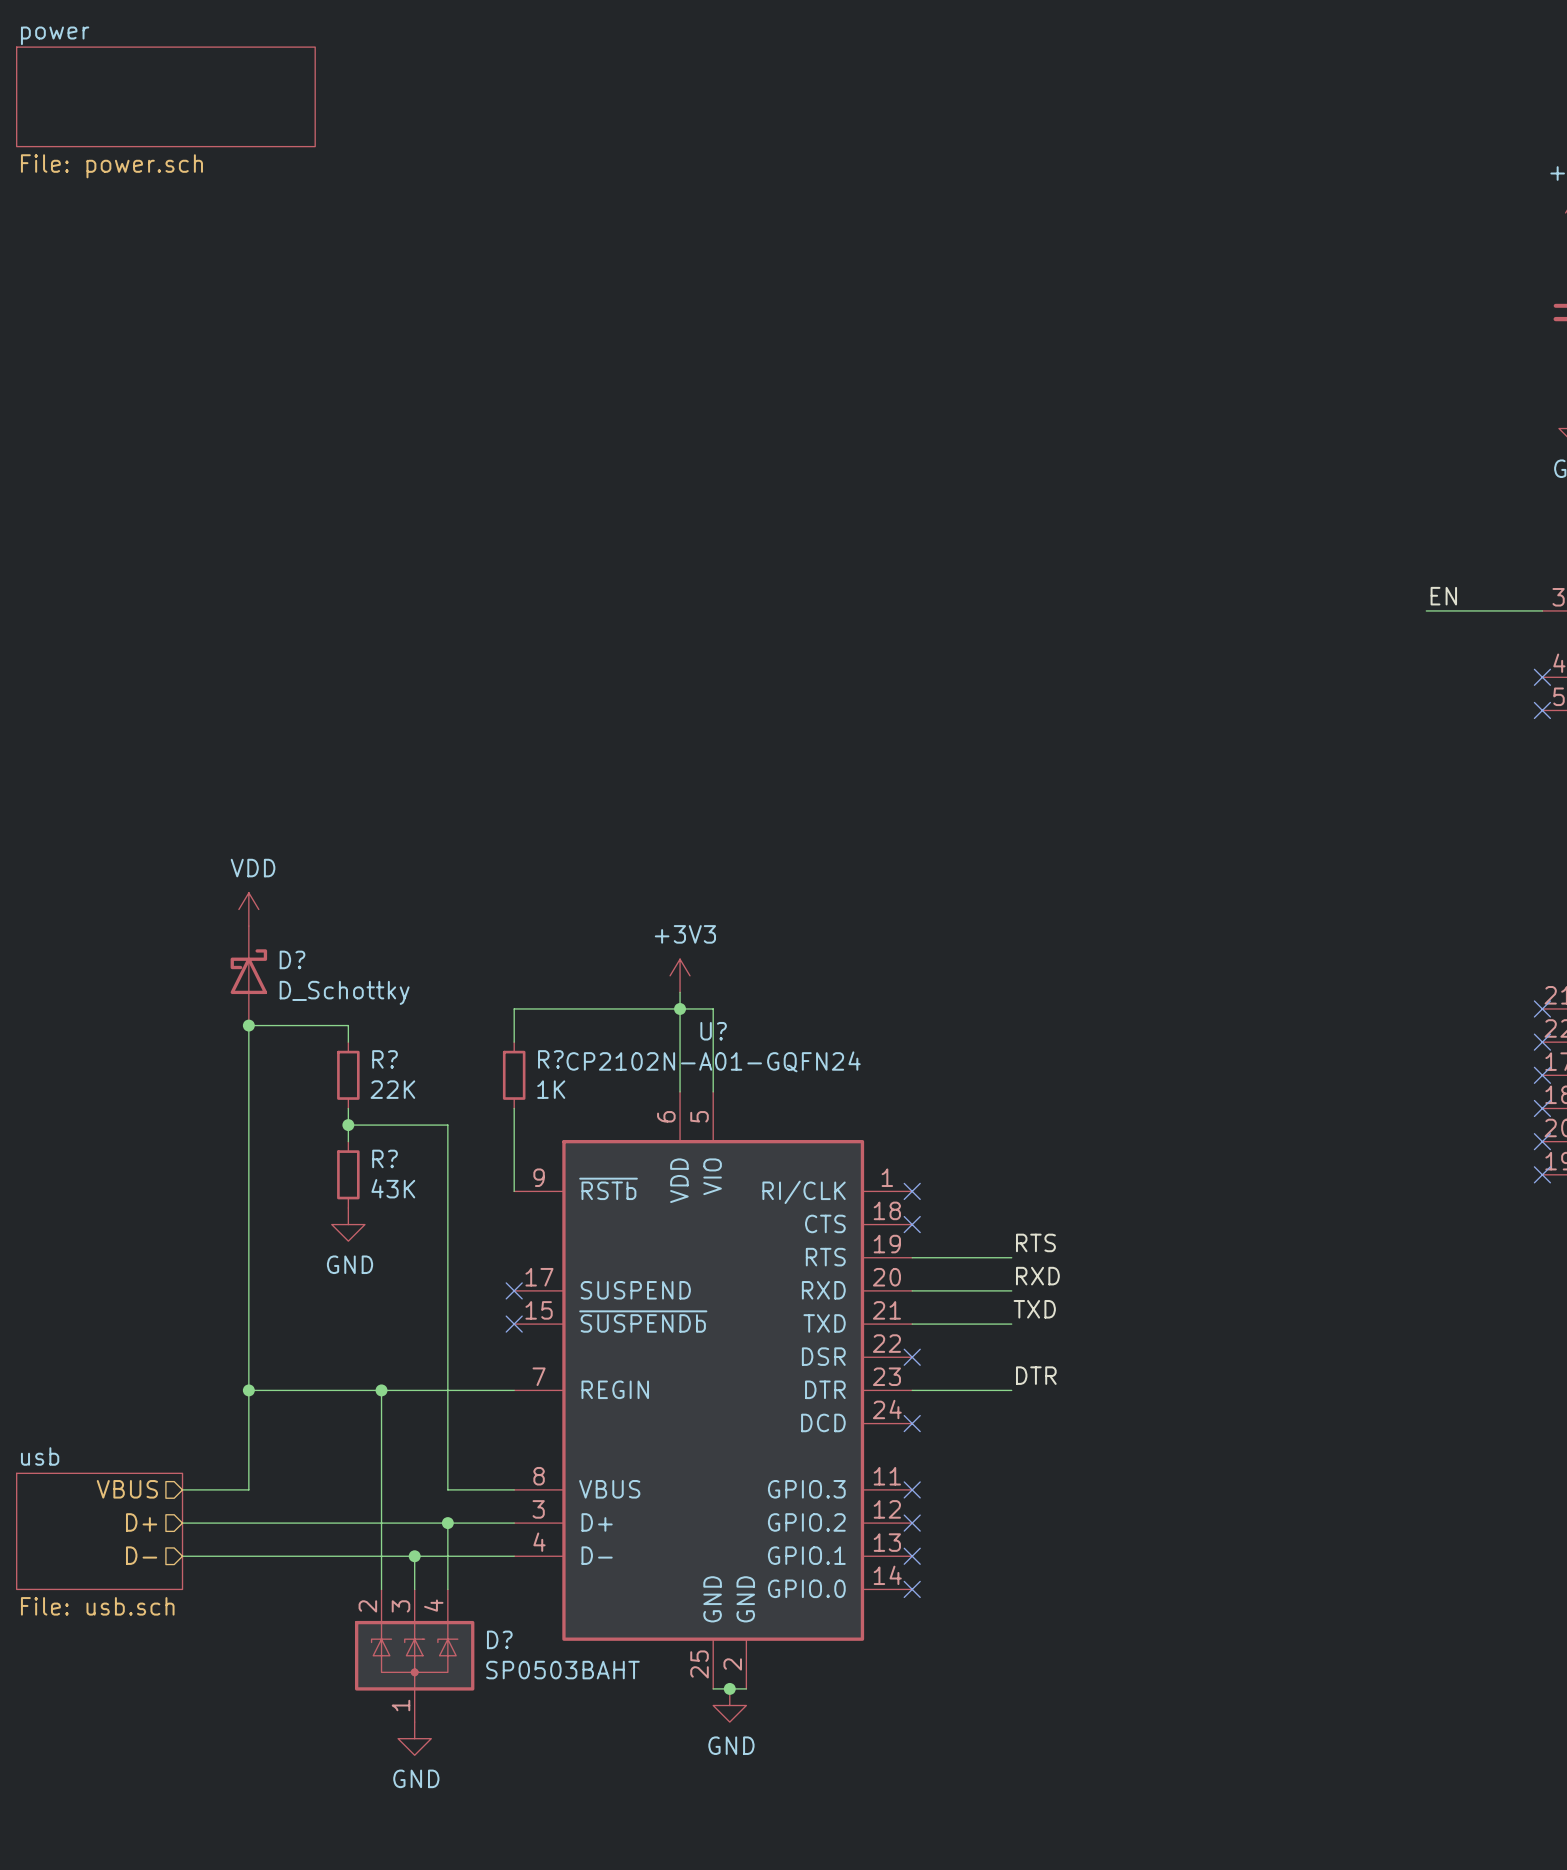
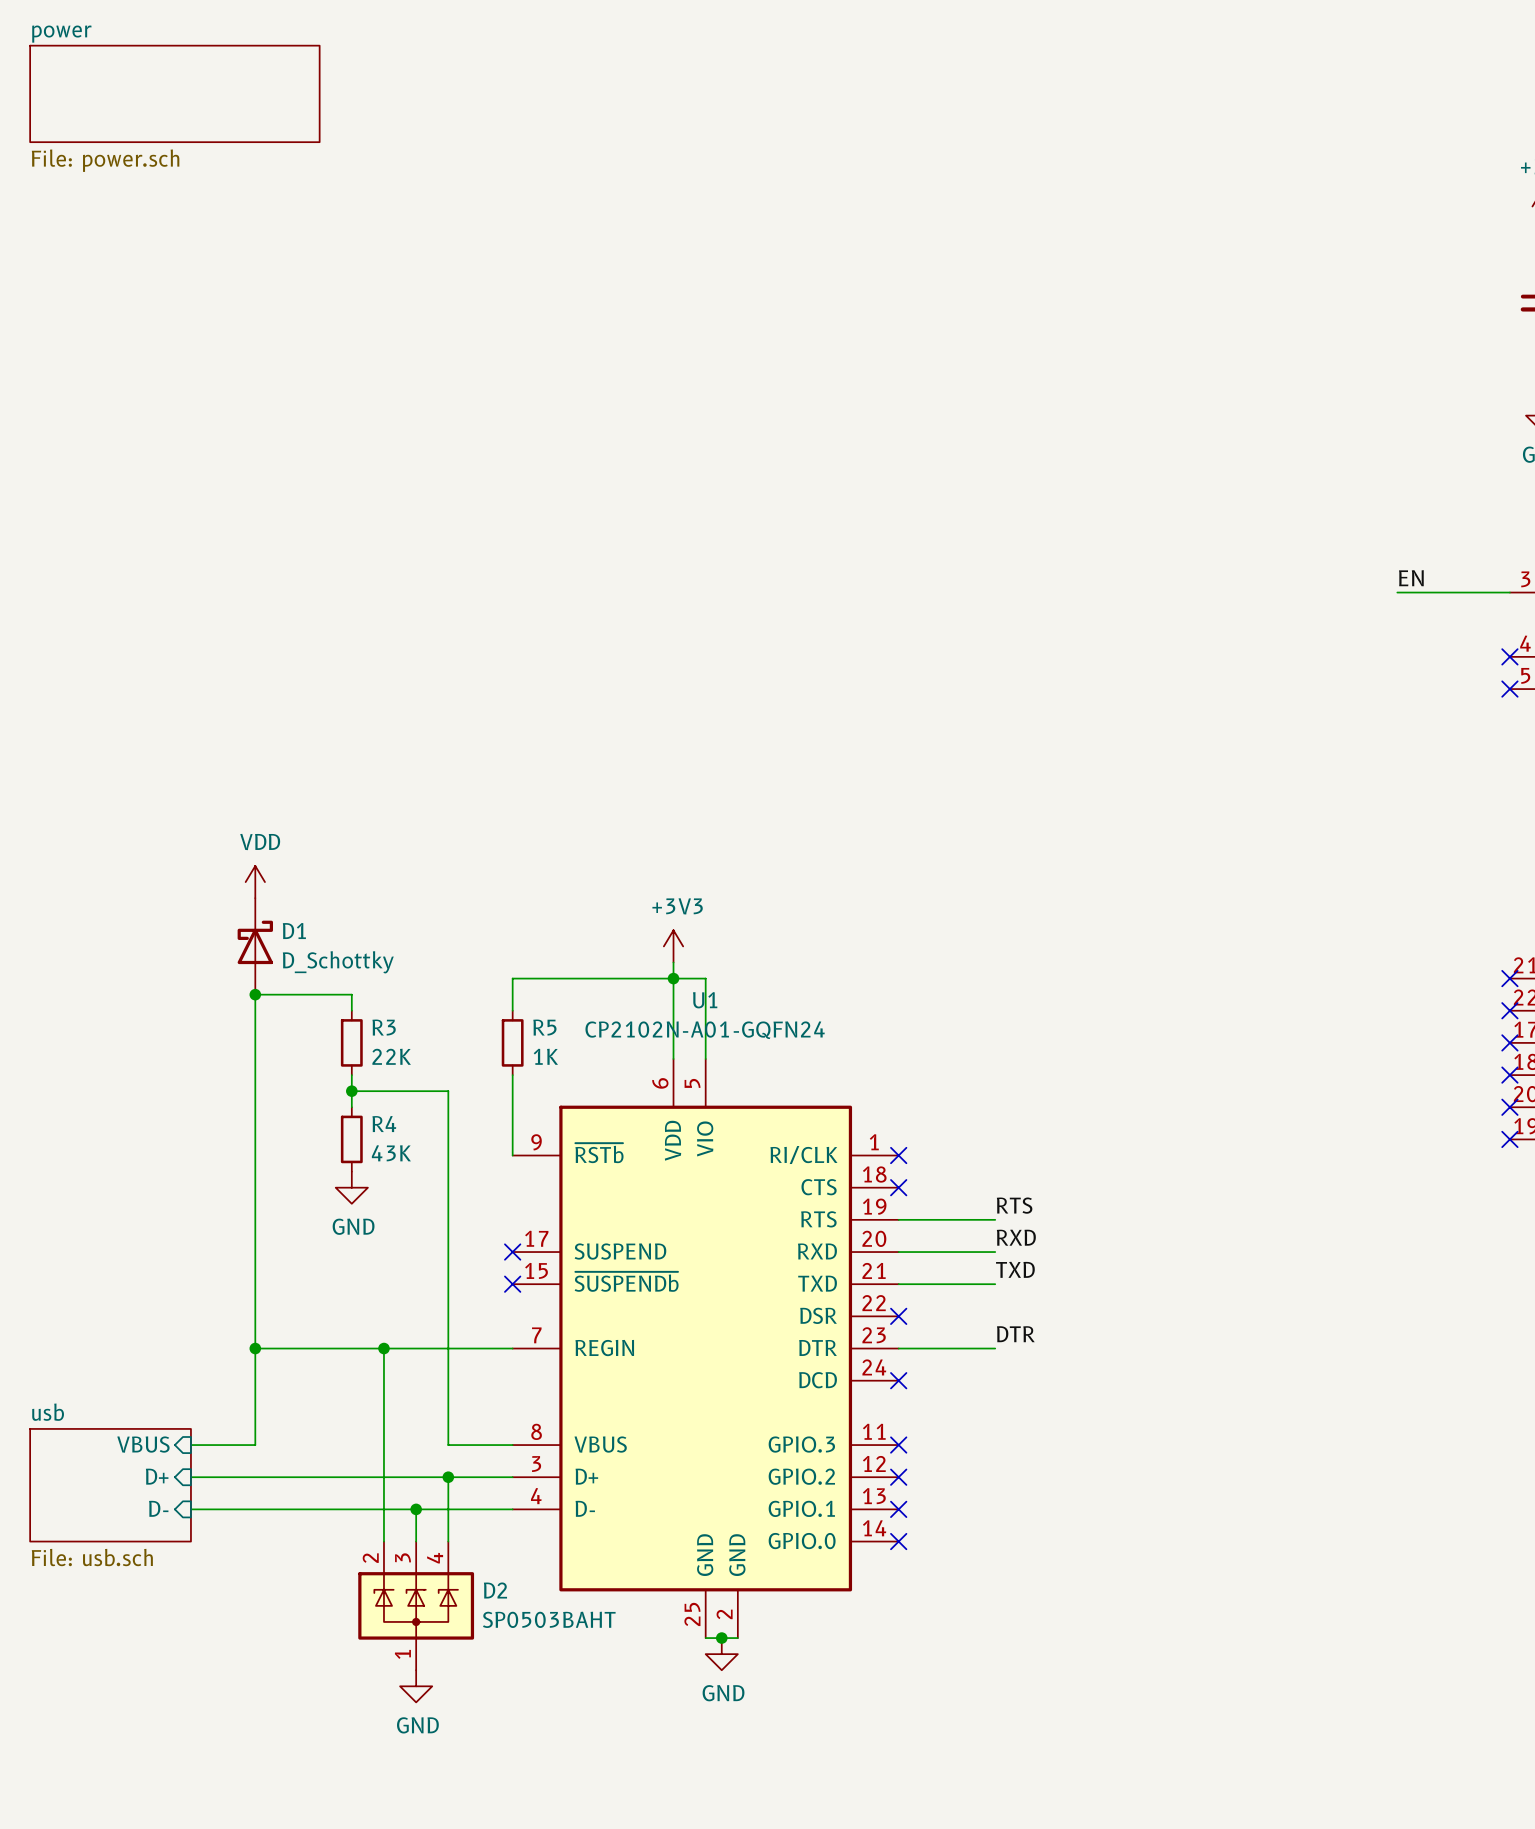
D? name: D? (292, 959) -> D1 (294, 931)
U? name: U? (713, 1031) -> U1 (705, 1000)
R? name: R? (385, 1059) -> R3 (384, 1027)
R? name: R? (550, 1059) -> R5 (544, 1027)
R? name: R? (385, 1158) -> R4 (384, 1124)
hierarchical label: VBUS (127, 1489) -> none
sheet pin: none -> VBUS (143, 1444)
hierarchical label: D+ (141, 1522) -> none
sheet pin: none -> D+ (157, 1476)
hierarchical label: D- (141, 1555) -> none
sheet pin: none -> D- (158, 1508)
D? name: D? (499, 1639) -> D2 (495, 1590)

